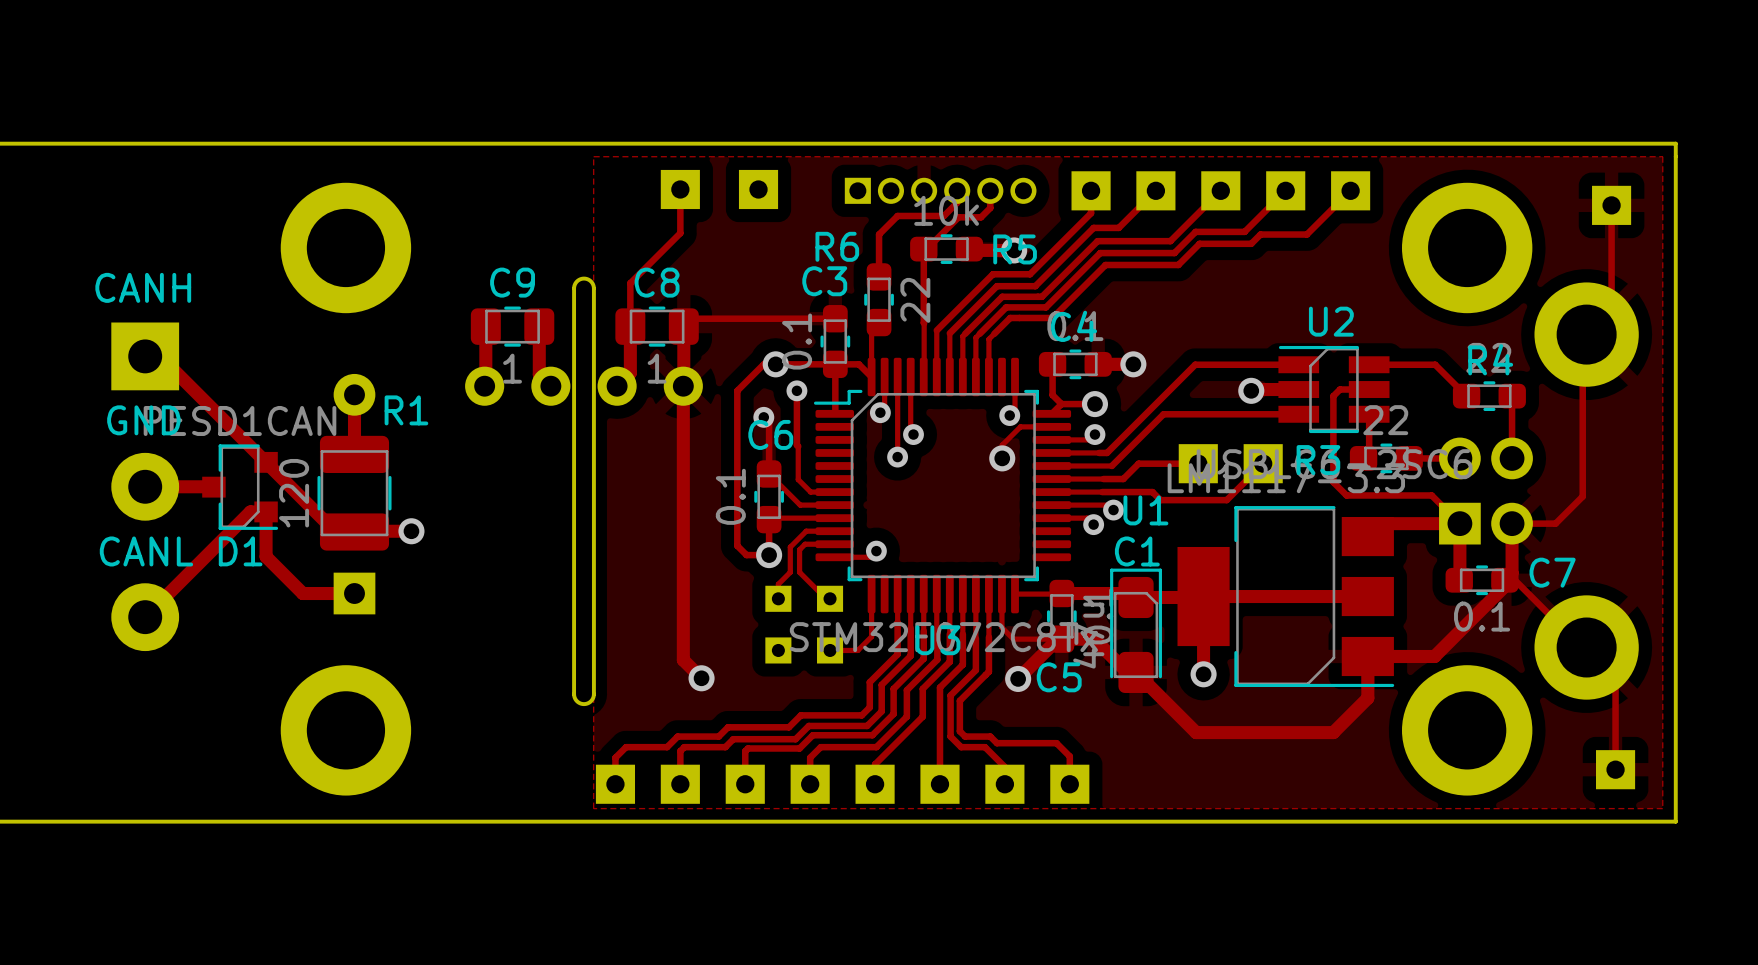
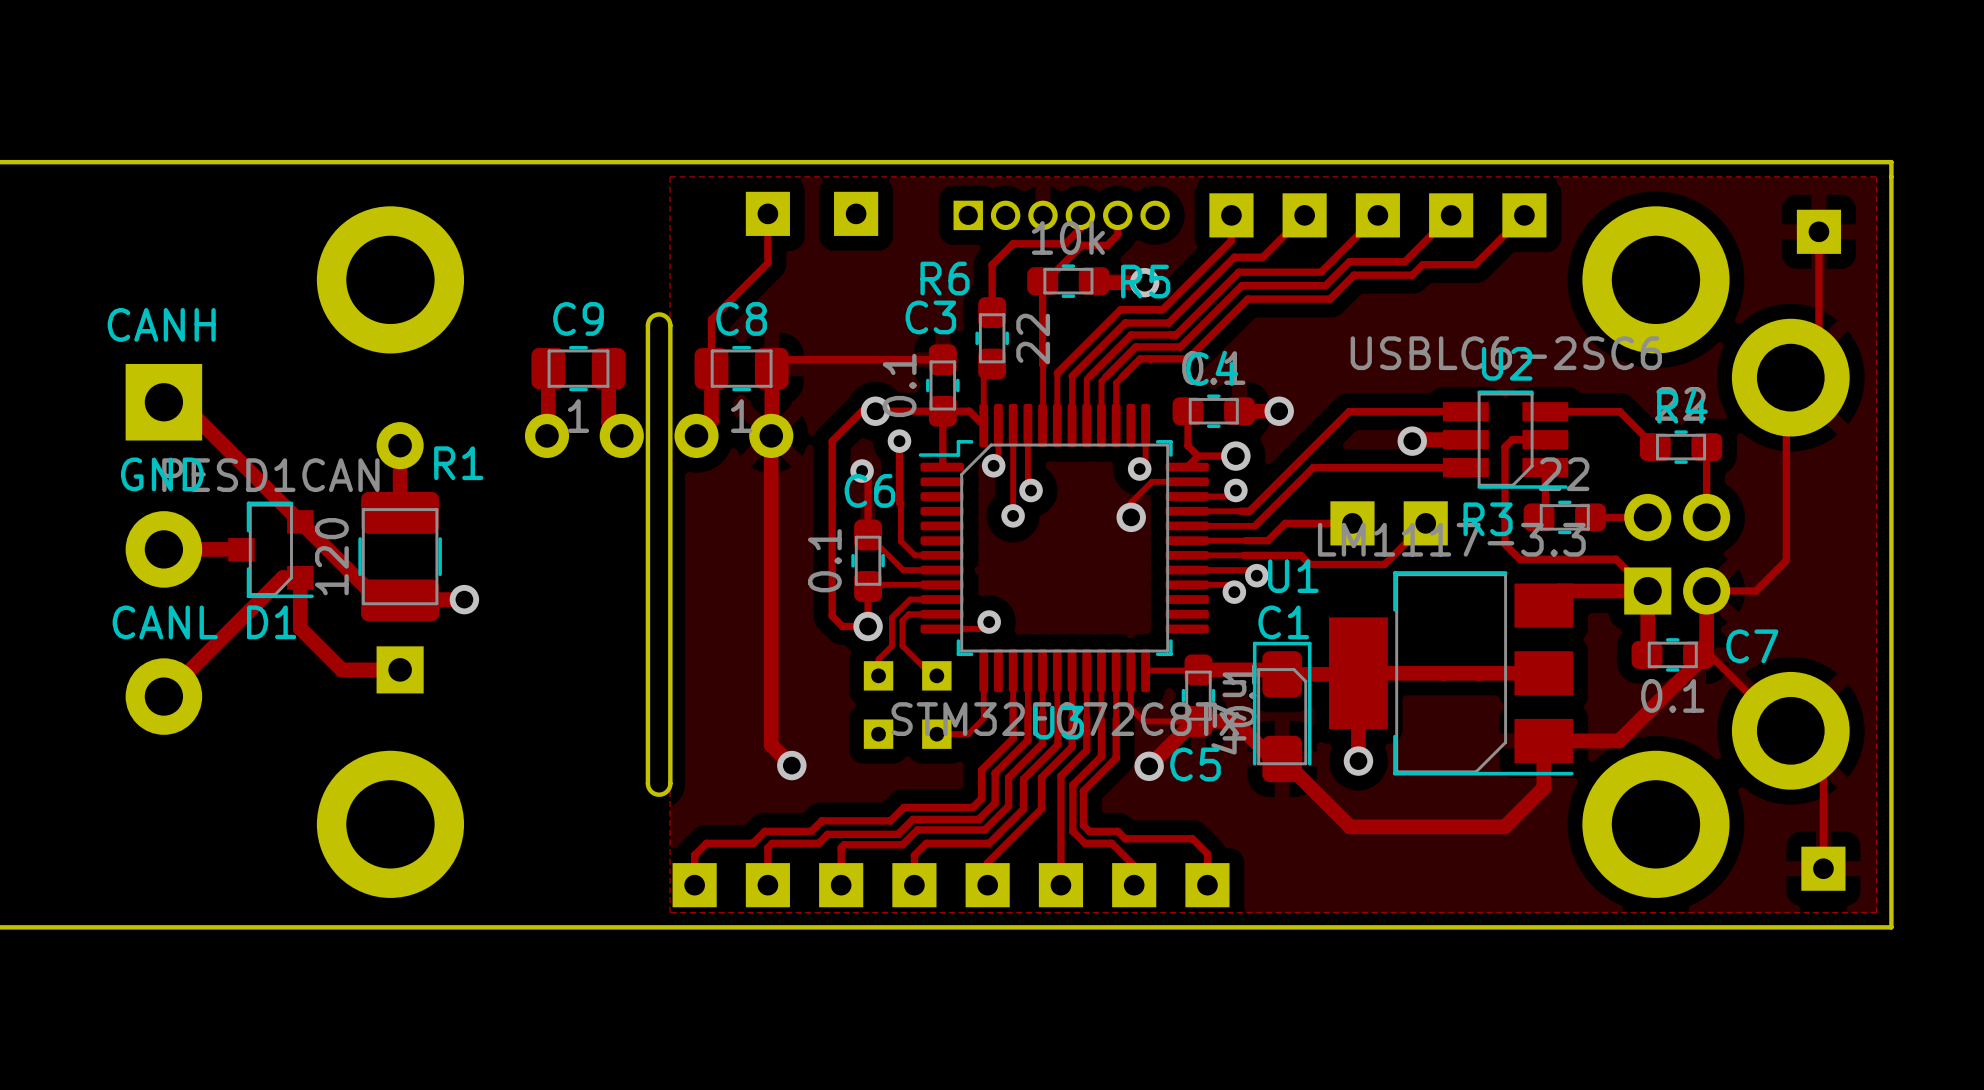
U2 rotation: 0° (1333, 389) -> 180° (1505, 439)

